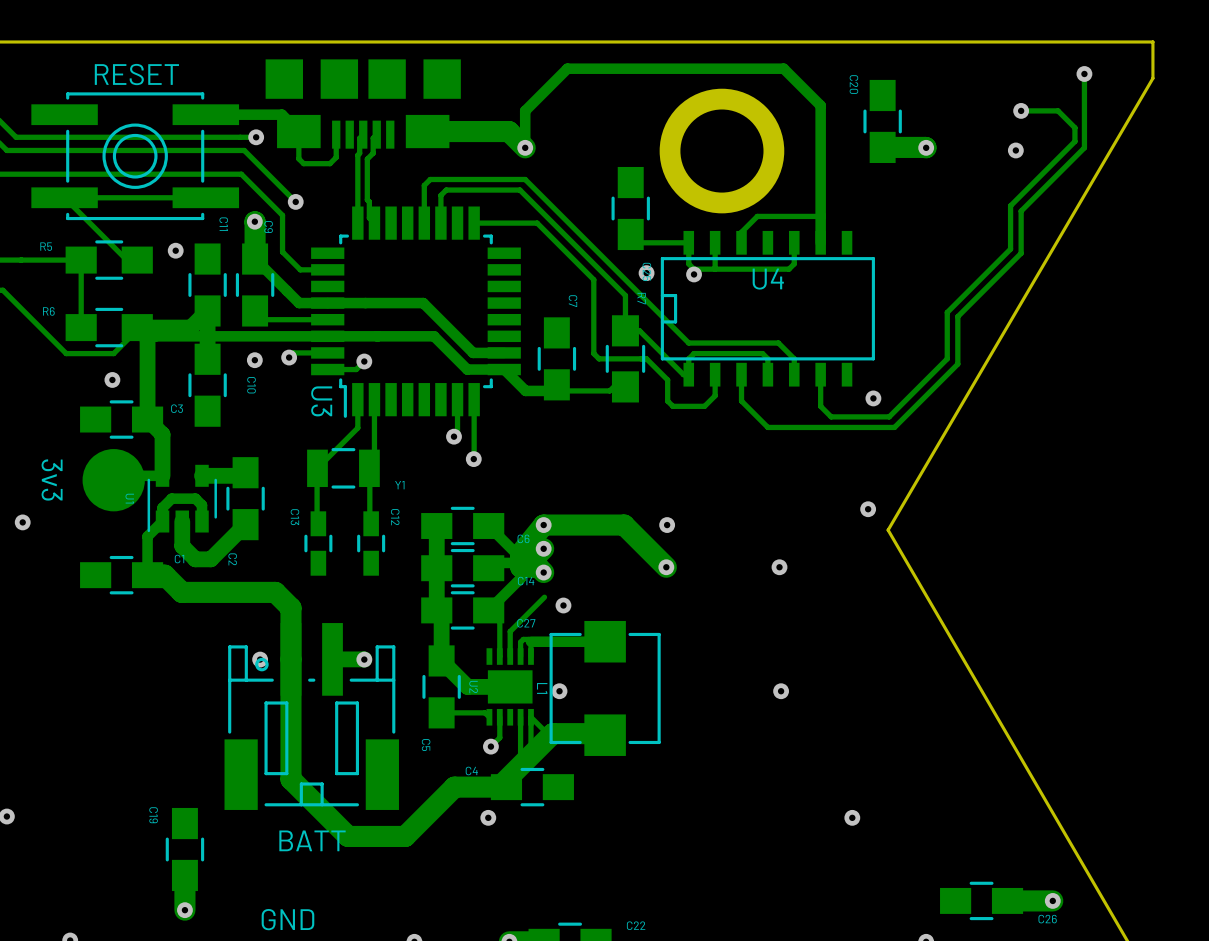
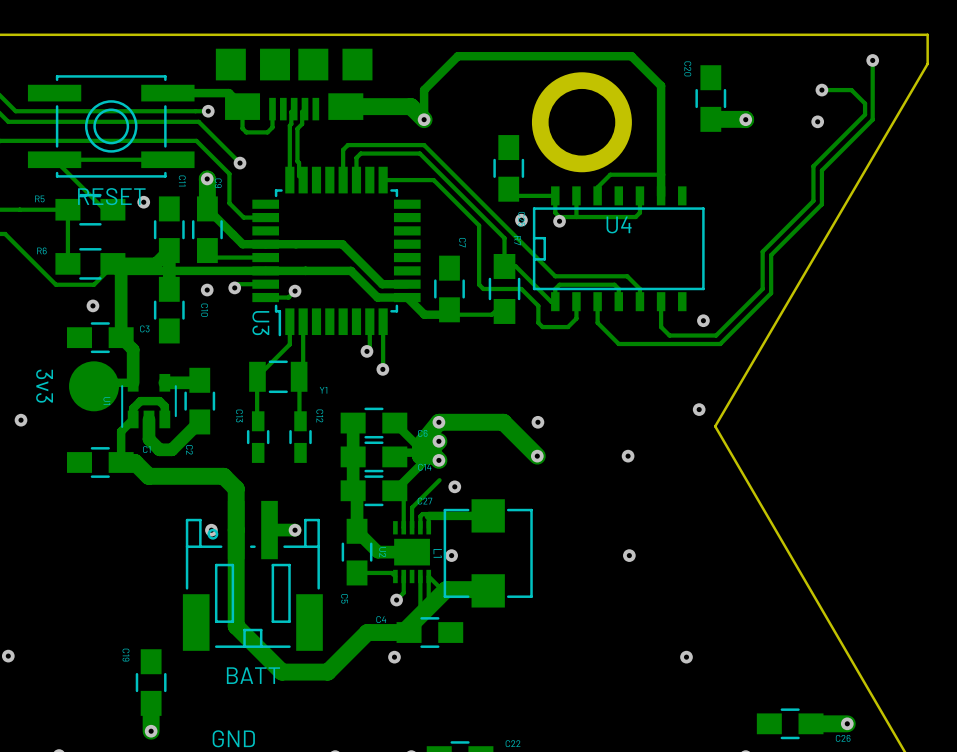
part value position: RESET (136, 74) -> RESET (111, 196)

